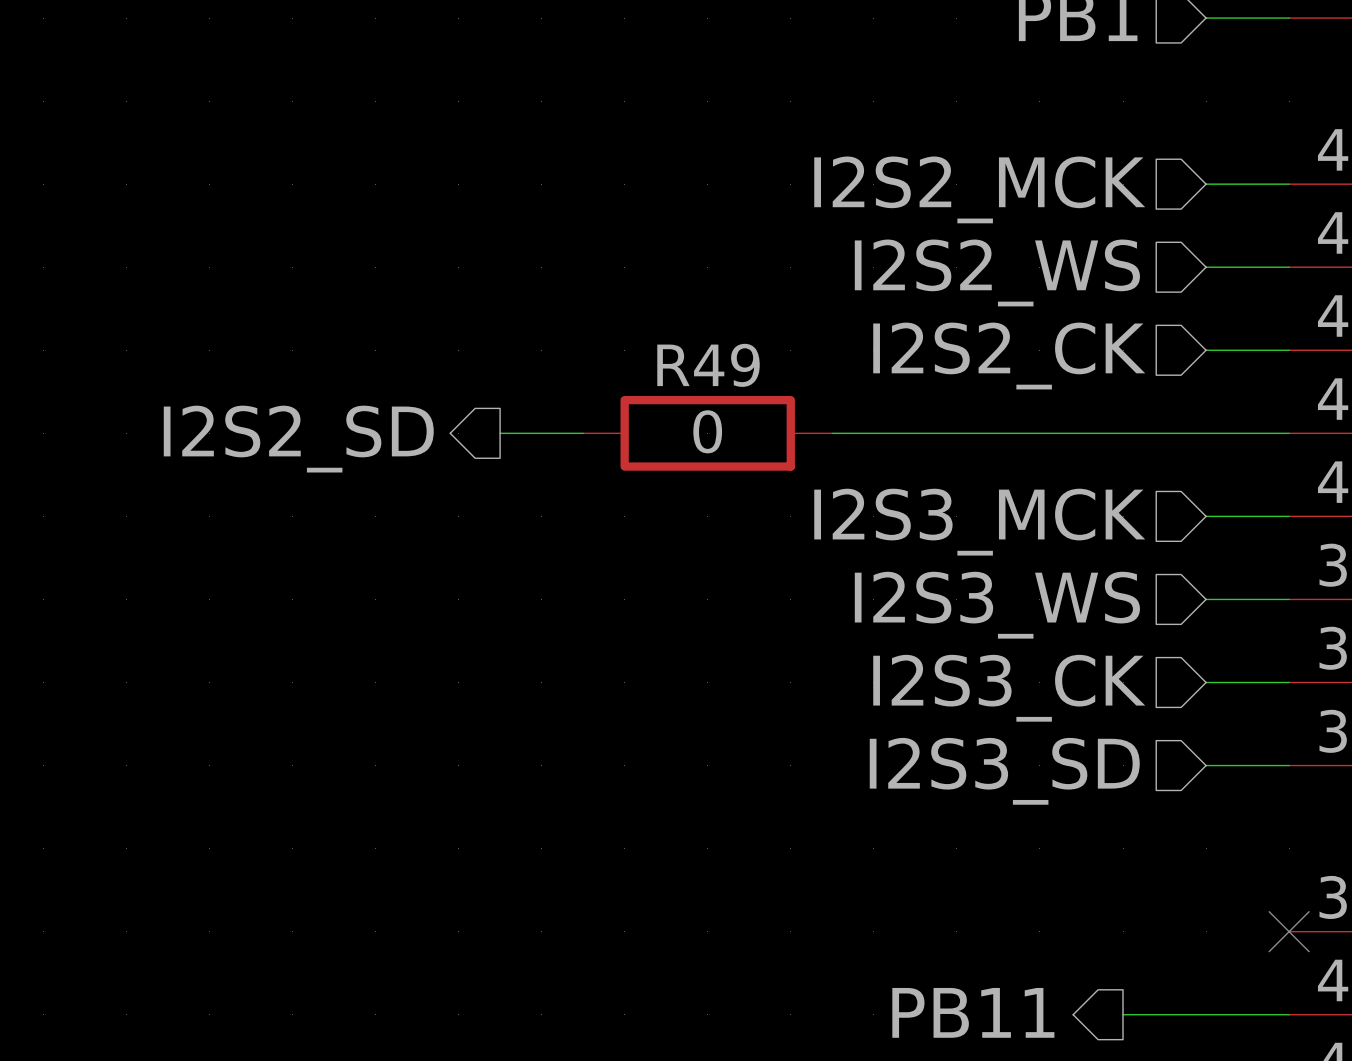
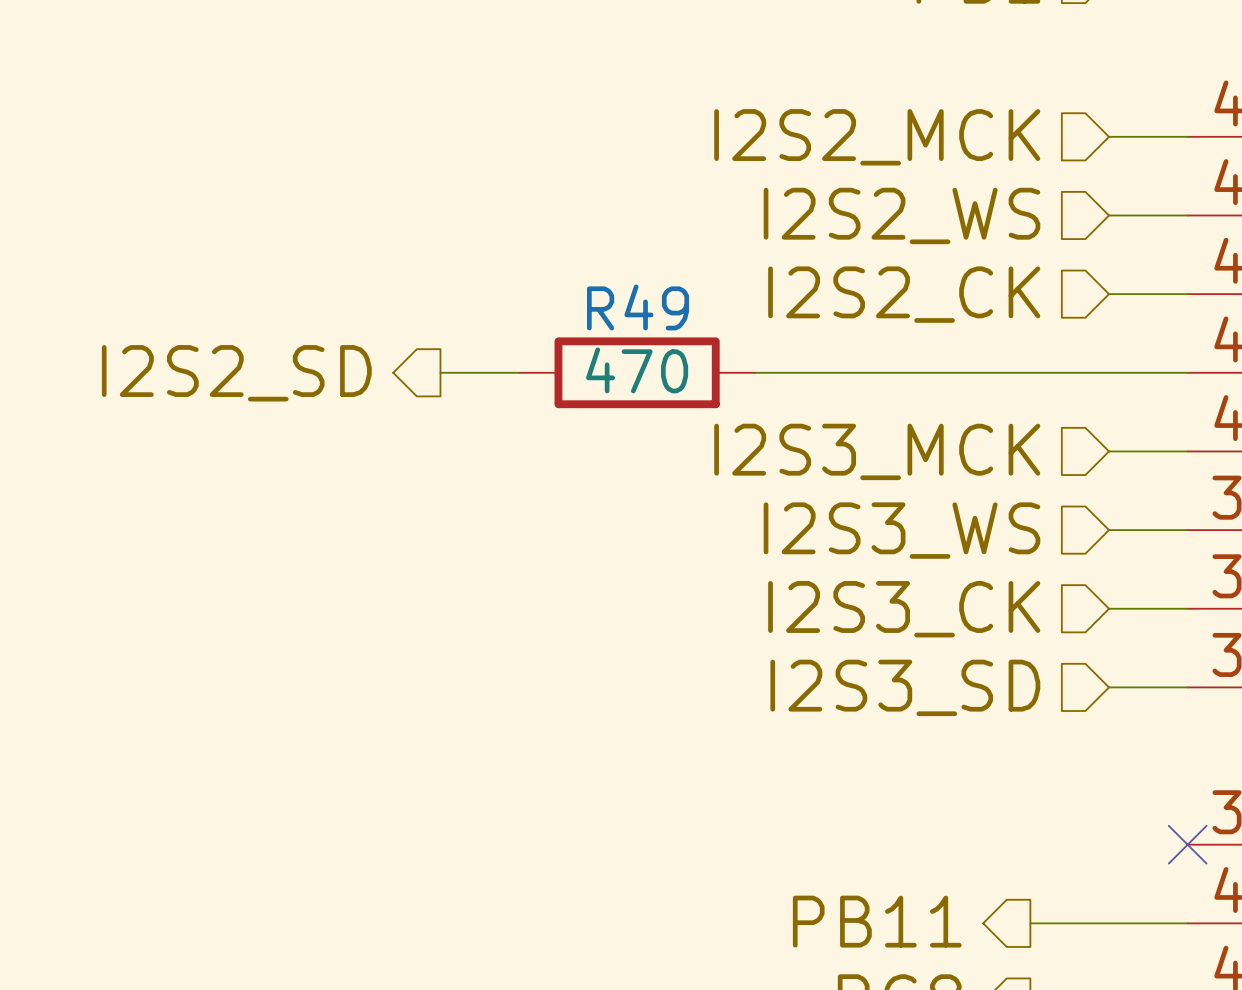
R49 value: 0 (707, 431) -> 470 (637, 370)

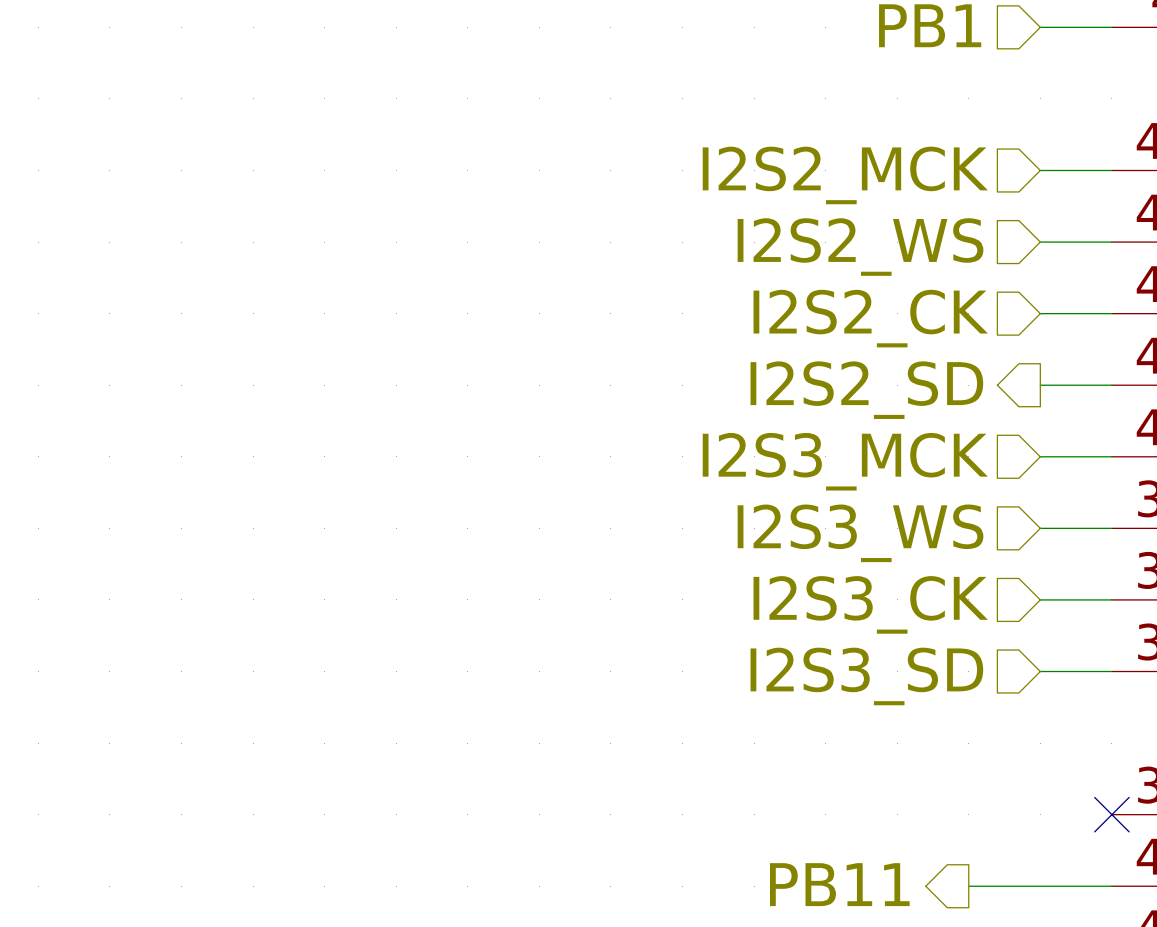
wire: (440, 372) (519, 372) -> none
R49: 470 (637, 372) -> none
wire: (755, 372) (1109, 372) -> none
hierarchical label position: I2S2_SD (236, 373) -> I2S2_SD (866, 390)

